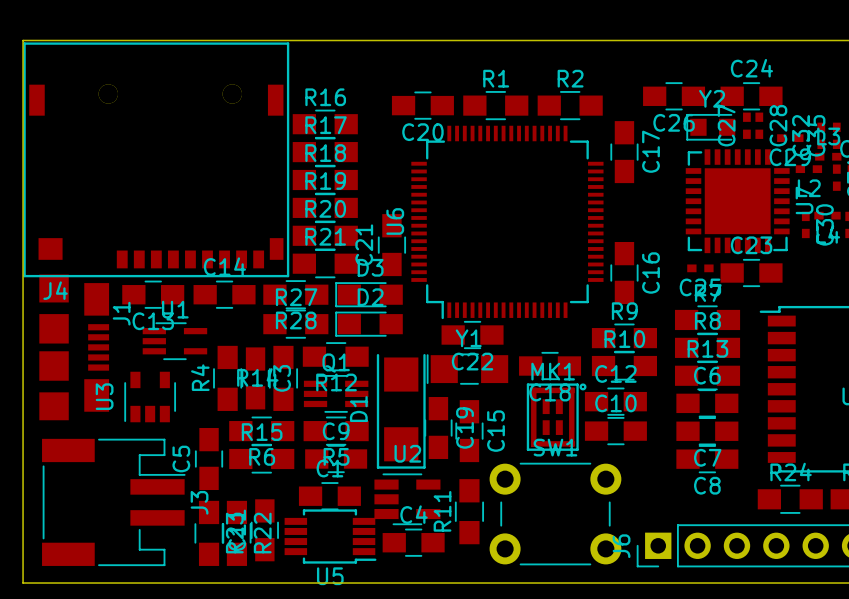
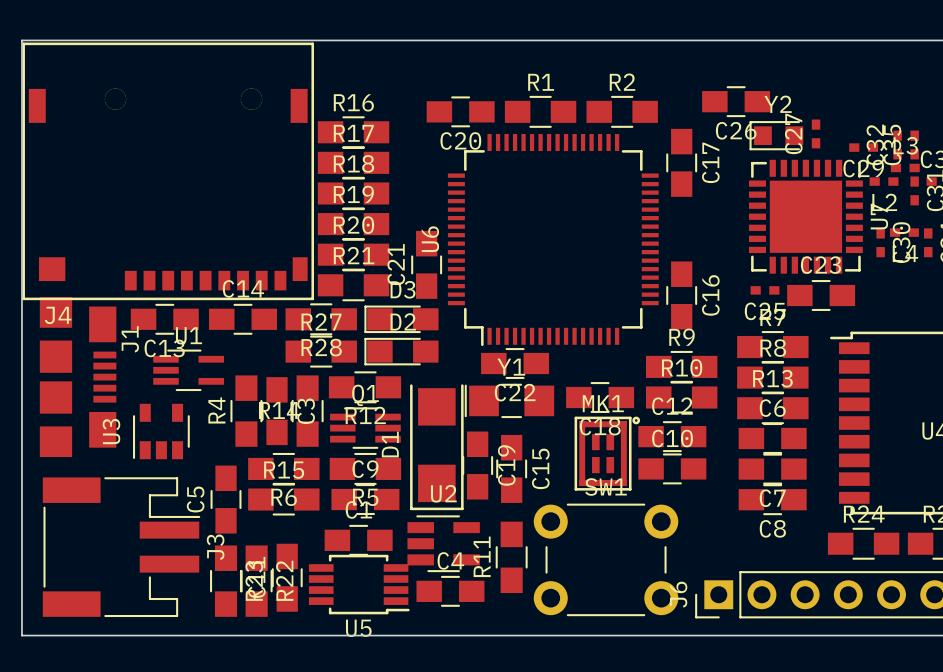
C24: (751, 96) -> none
C28: (759, 125) -> none

